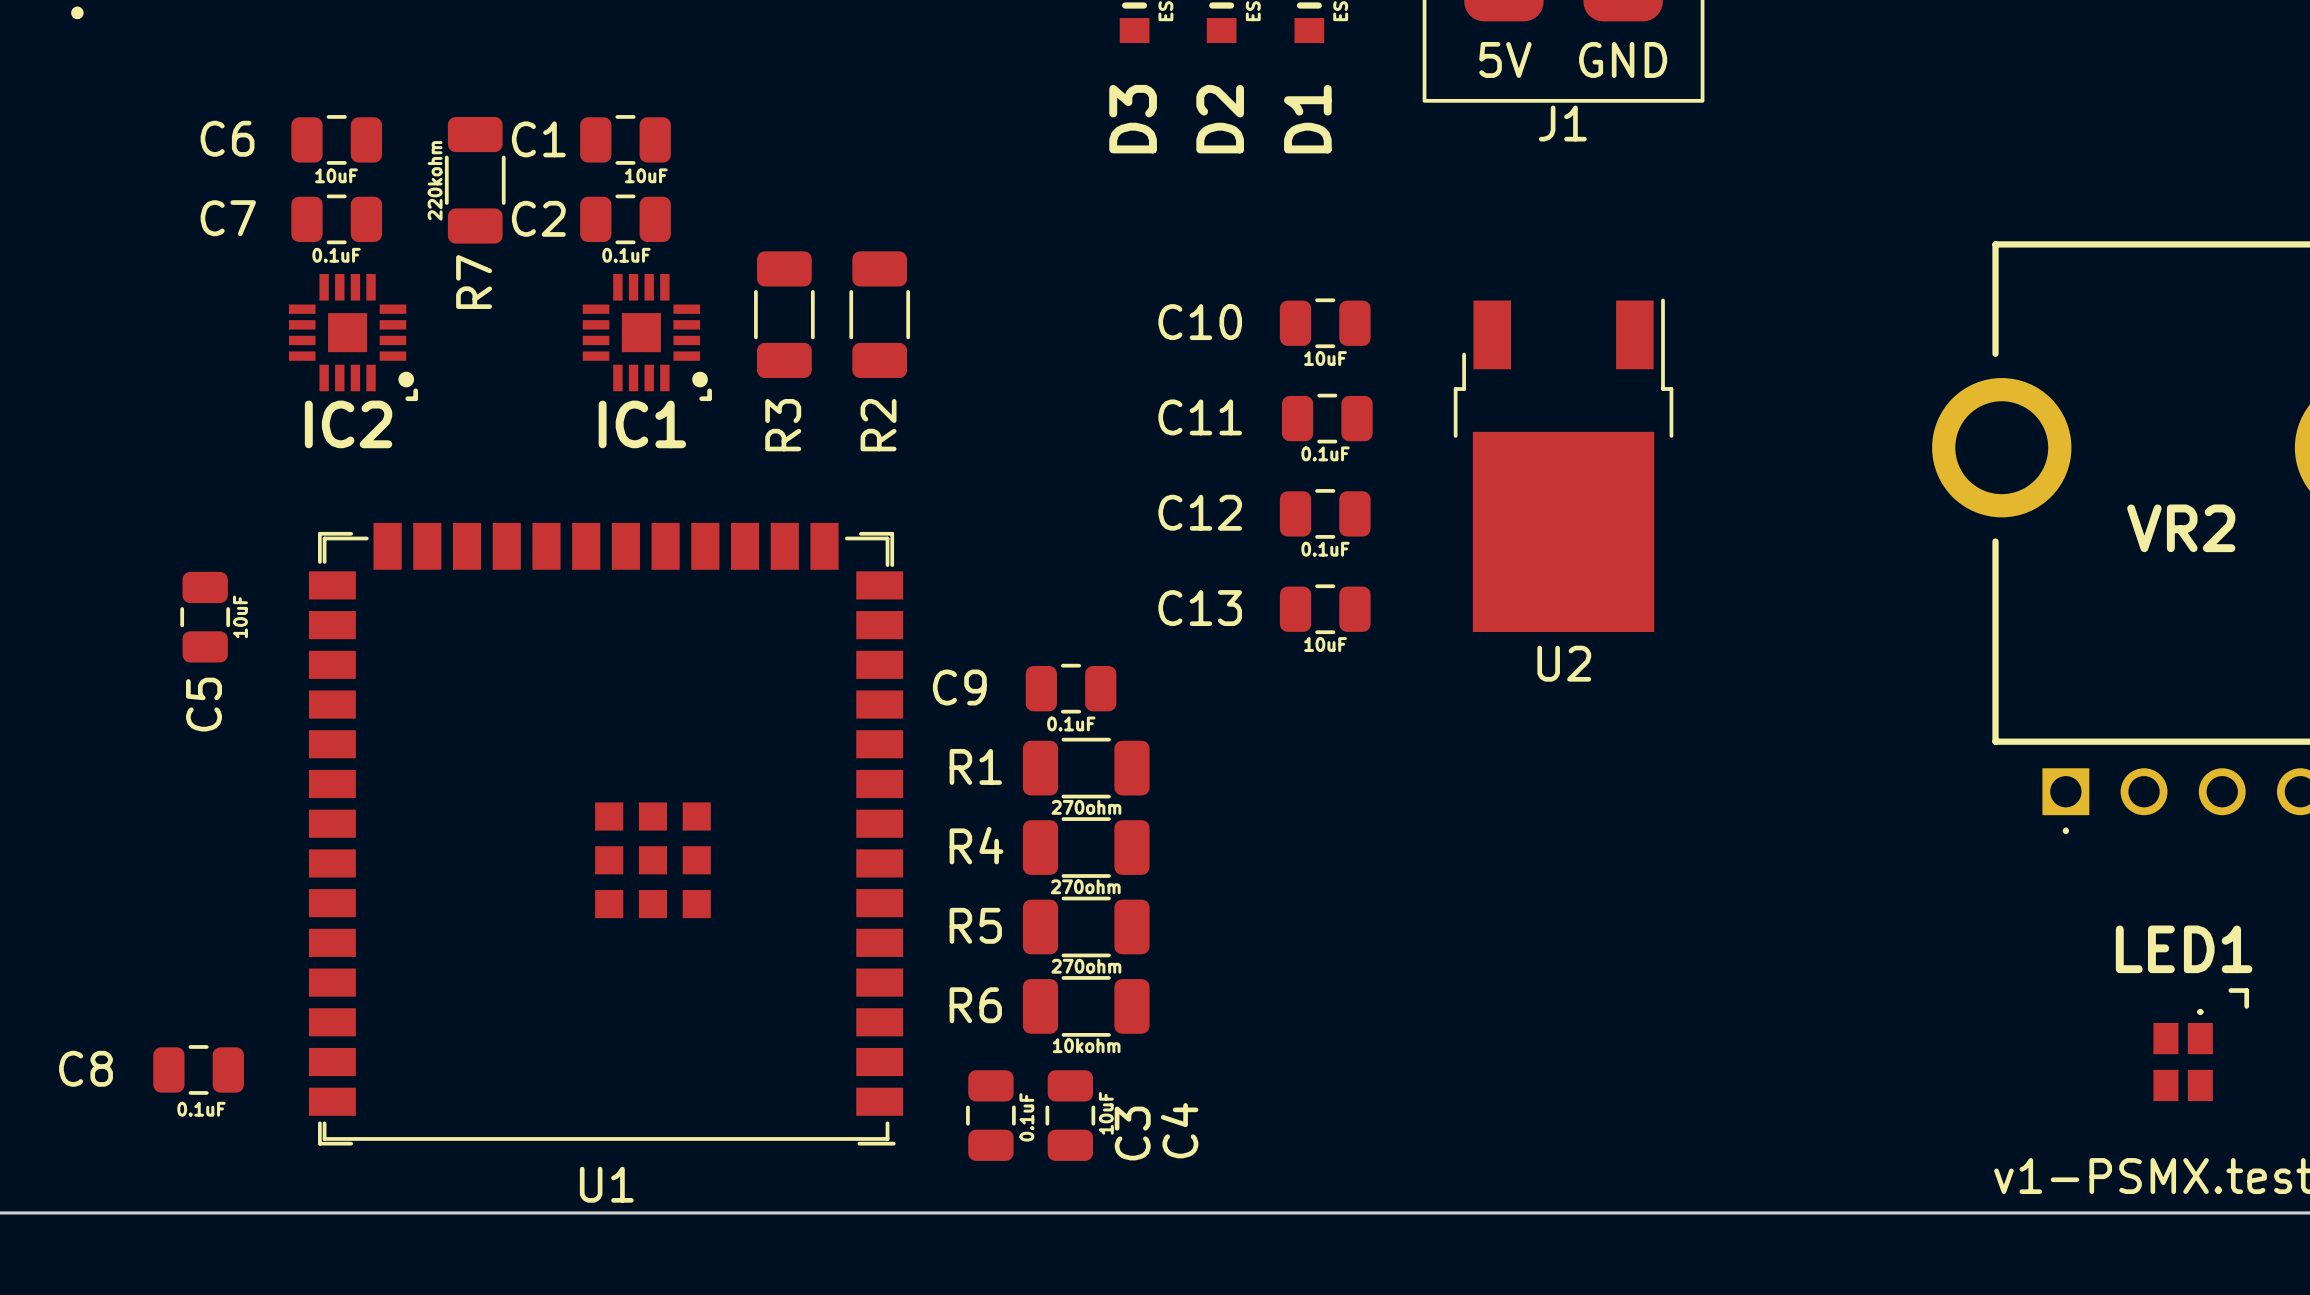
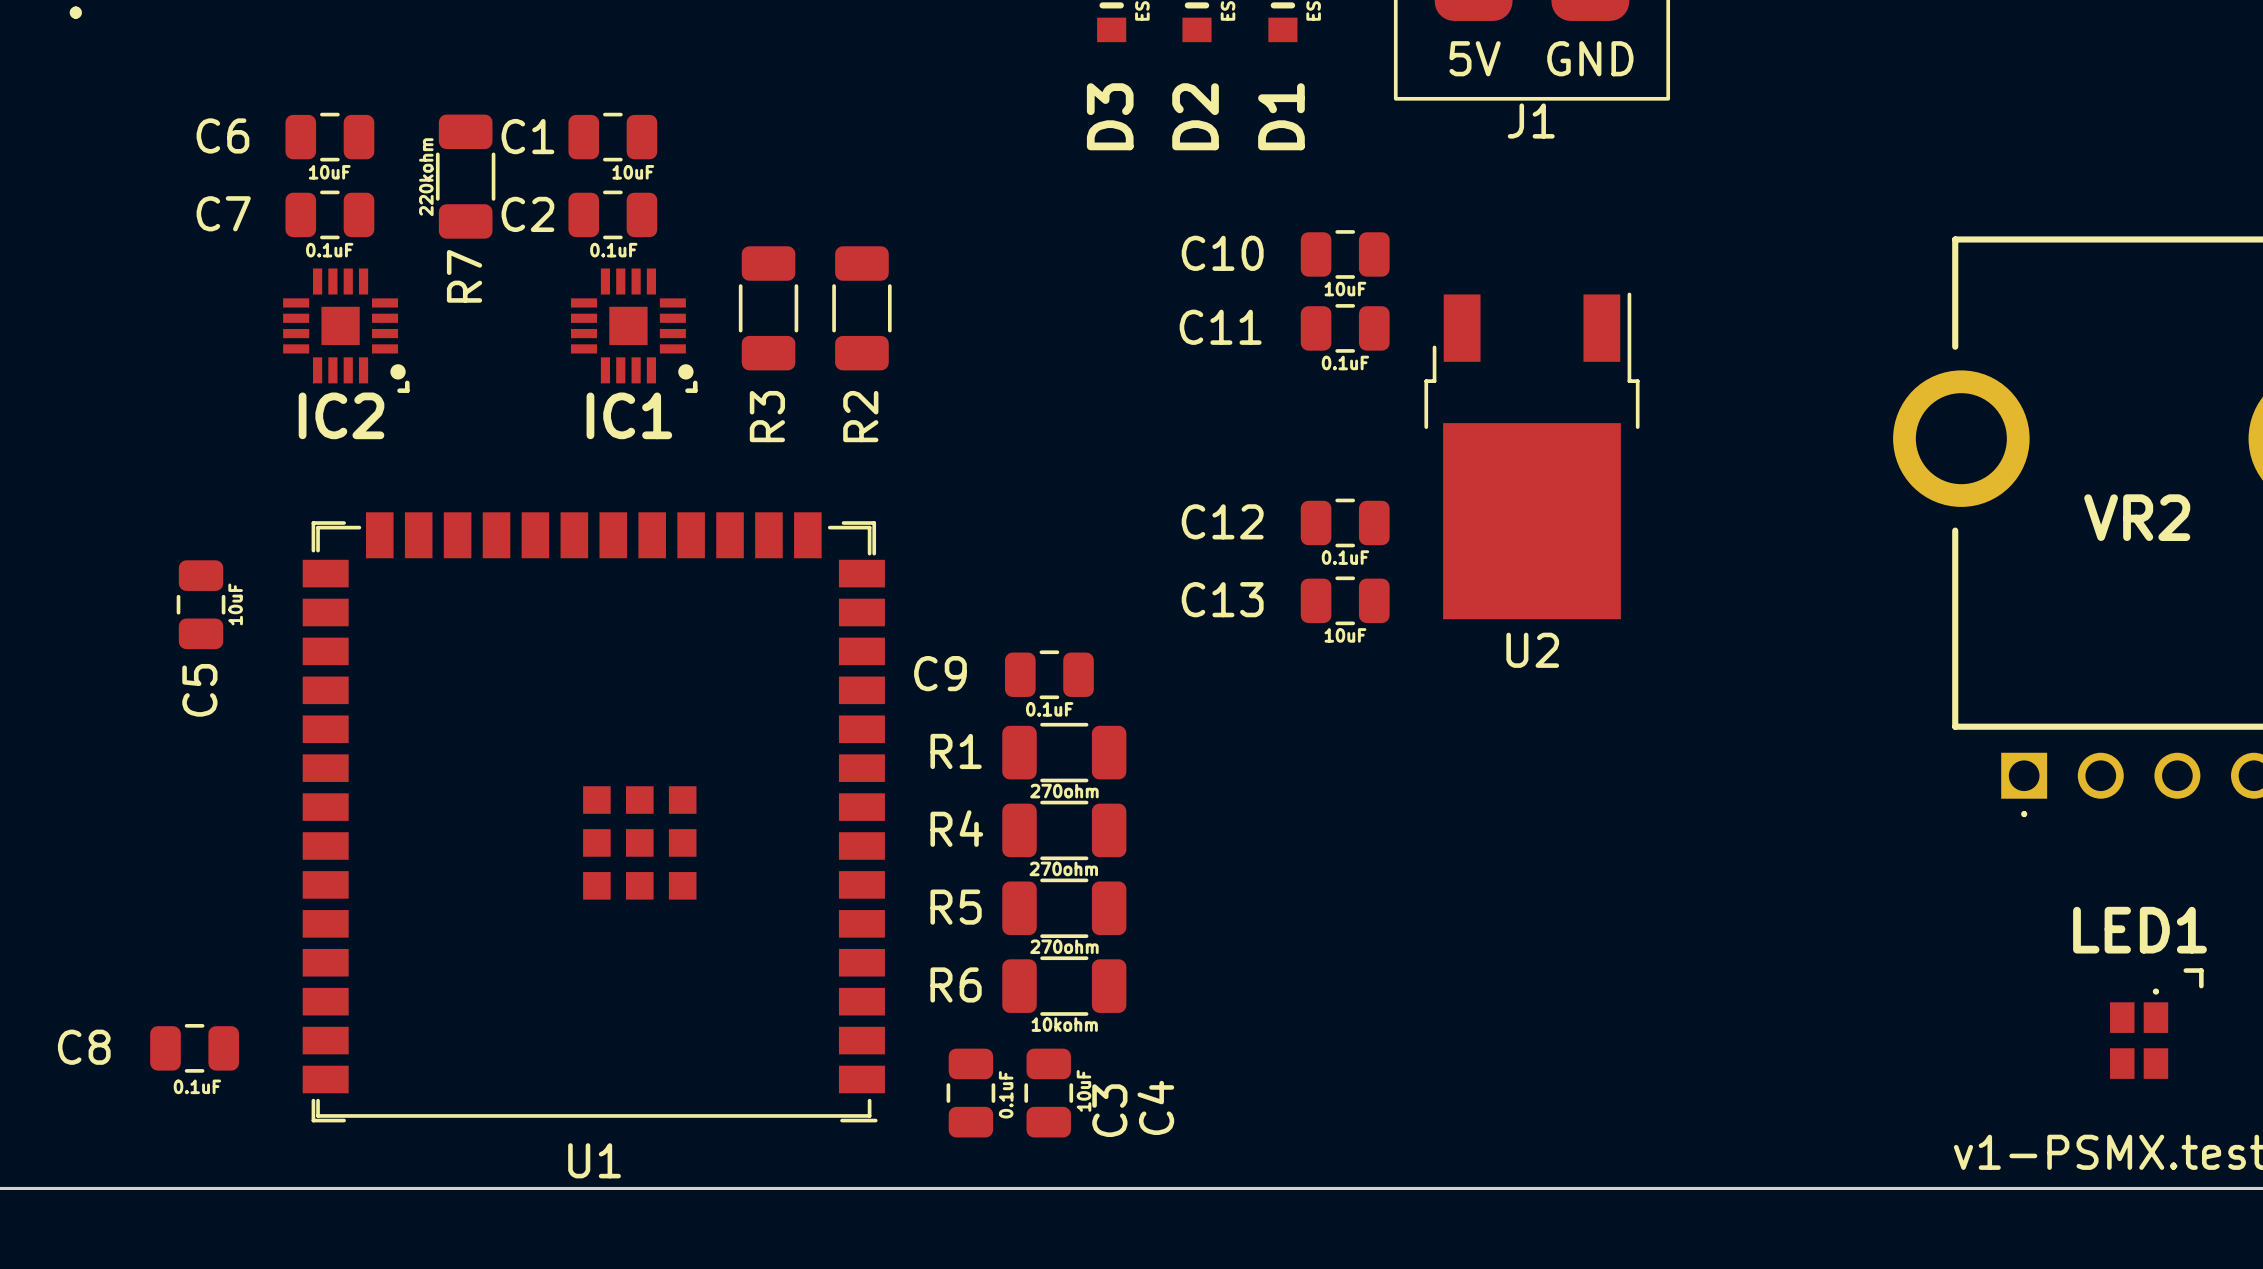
C10 position: (1325, 323) -> (1345, 254)
text position: 10uF (1325, 358) -> 10uF (1345, 289)
text: none -> 0.1uF (1345, 362)
C11 position: (1327, 418) -> (1345, 328)
text: 0.1uF (1325, 453) -> none
C12 position: (1325, 513) -> (1345, 522)
text position: 0.1uF (1325, 549) -> 0.1uF (1345, 557)
C13 position: (1325, 609) -> (1345, 600)
text position: 10uF (1325, 644) -> 10uF (1345, 635)

